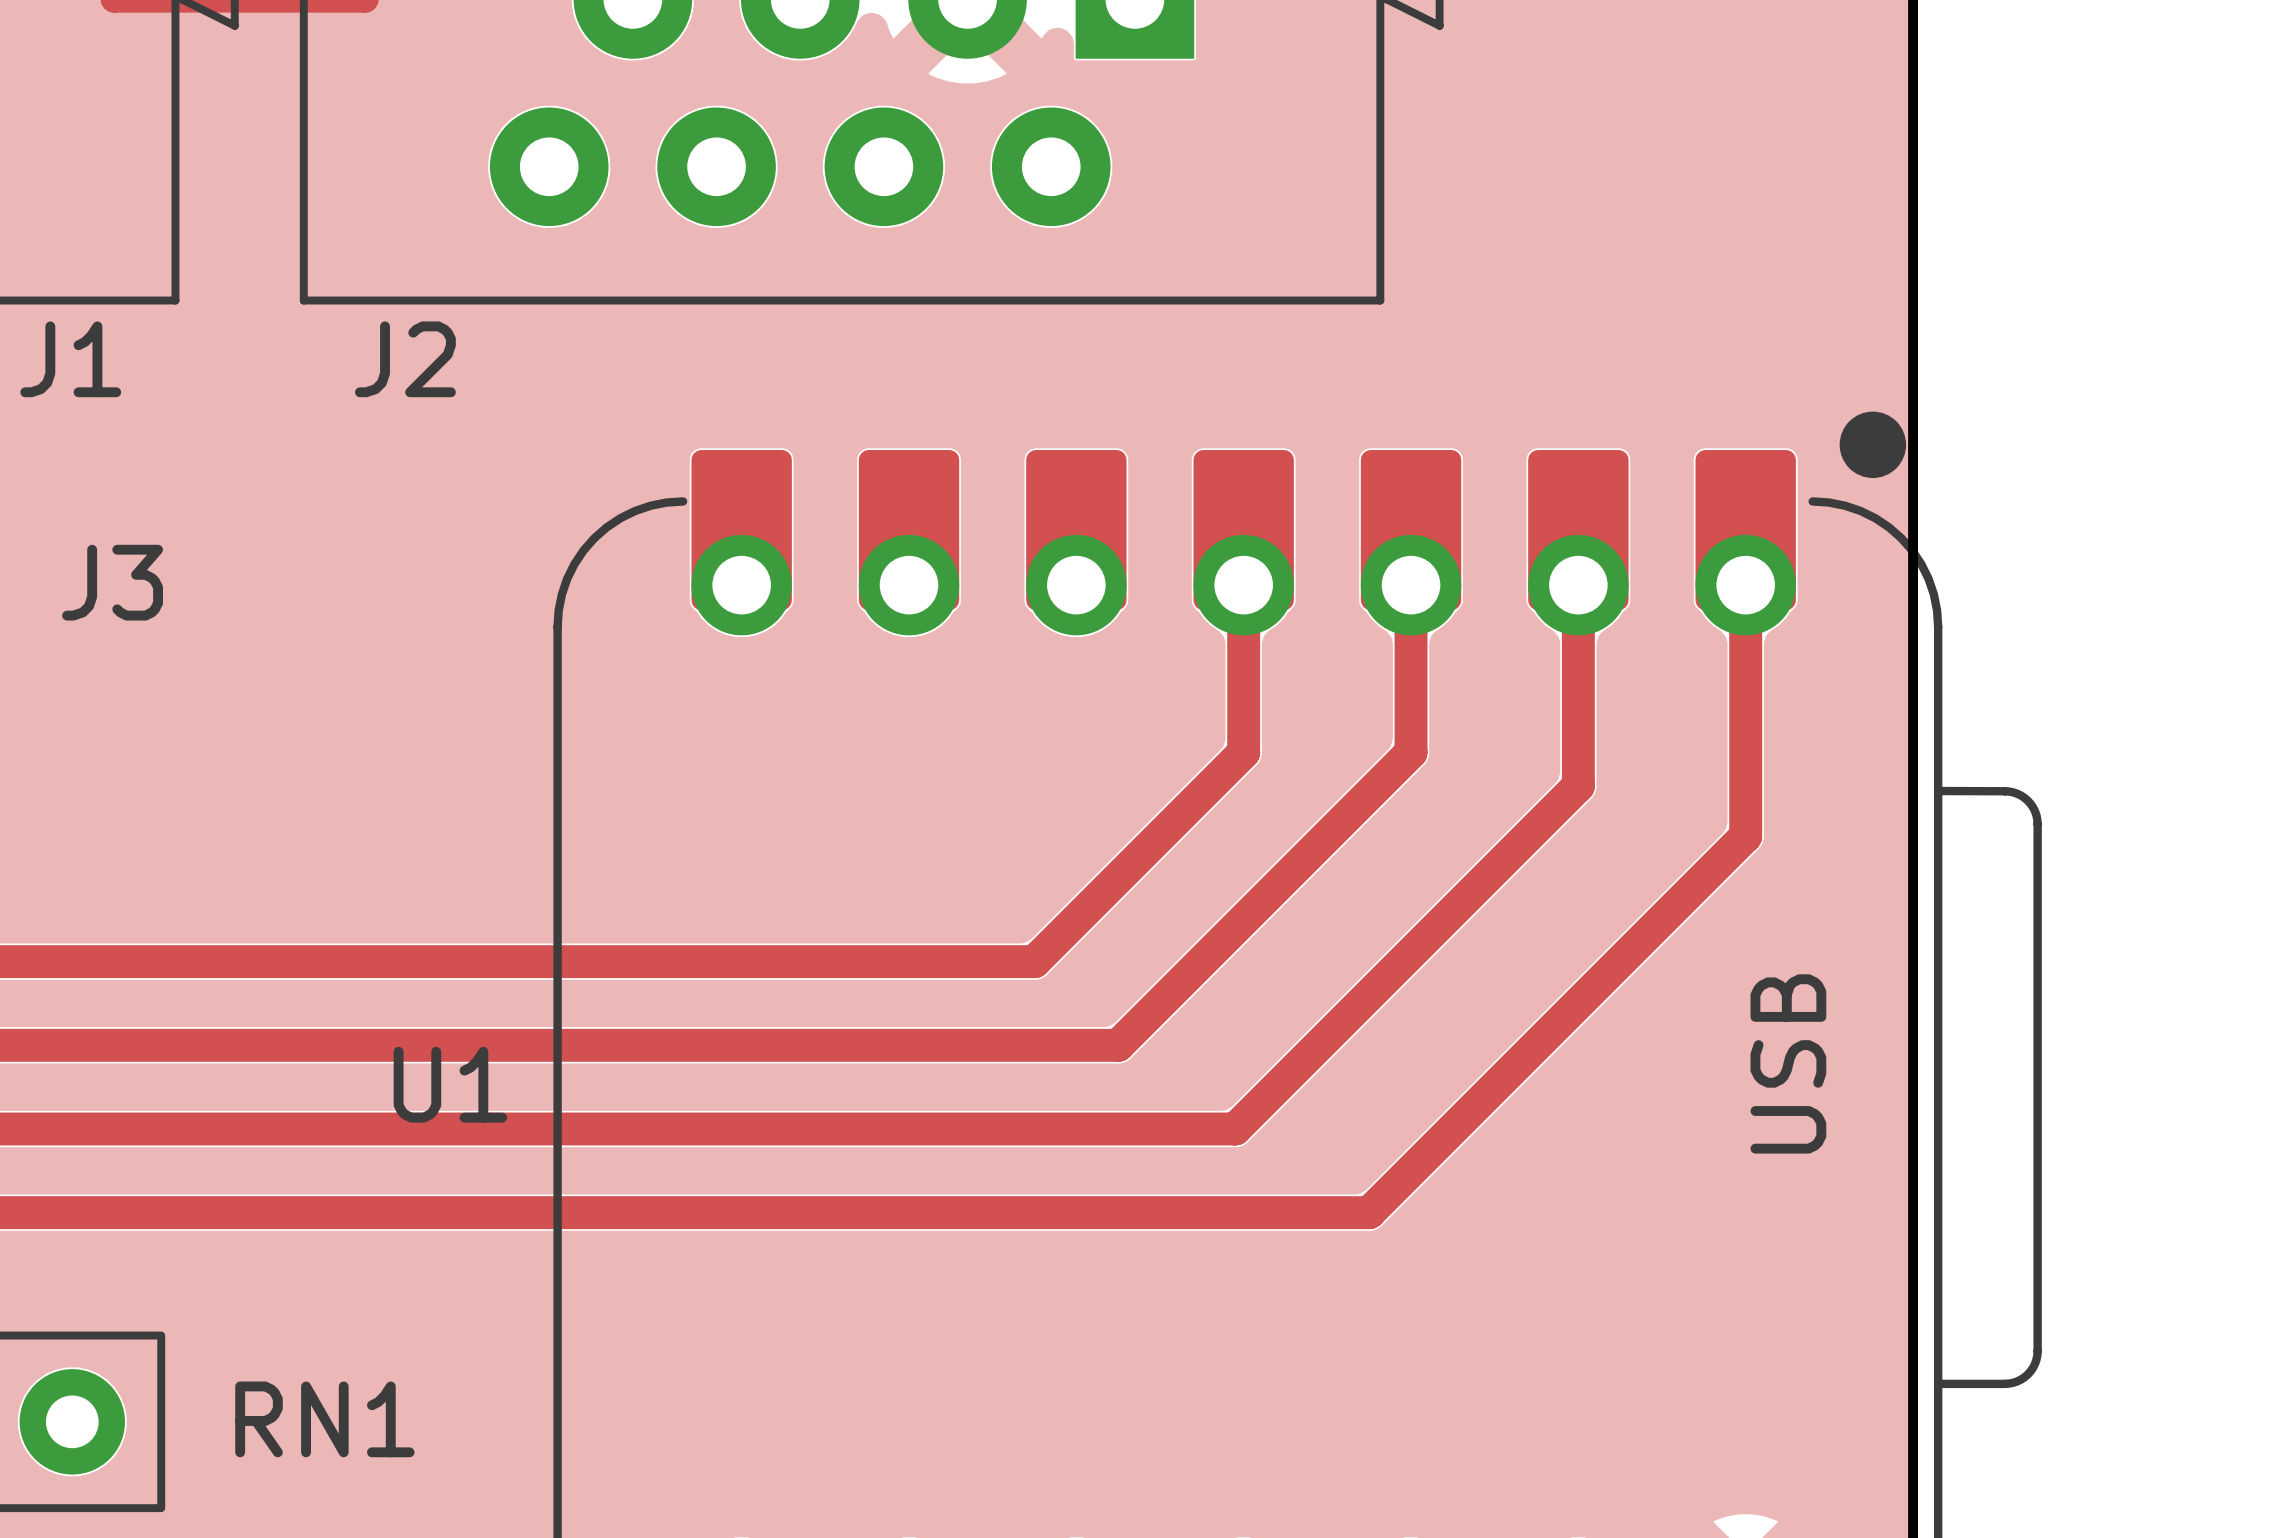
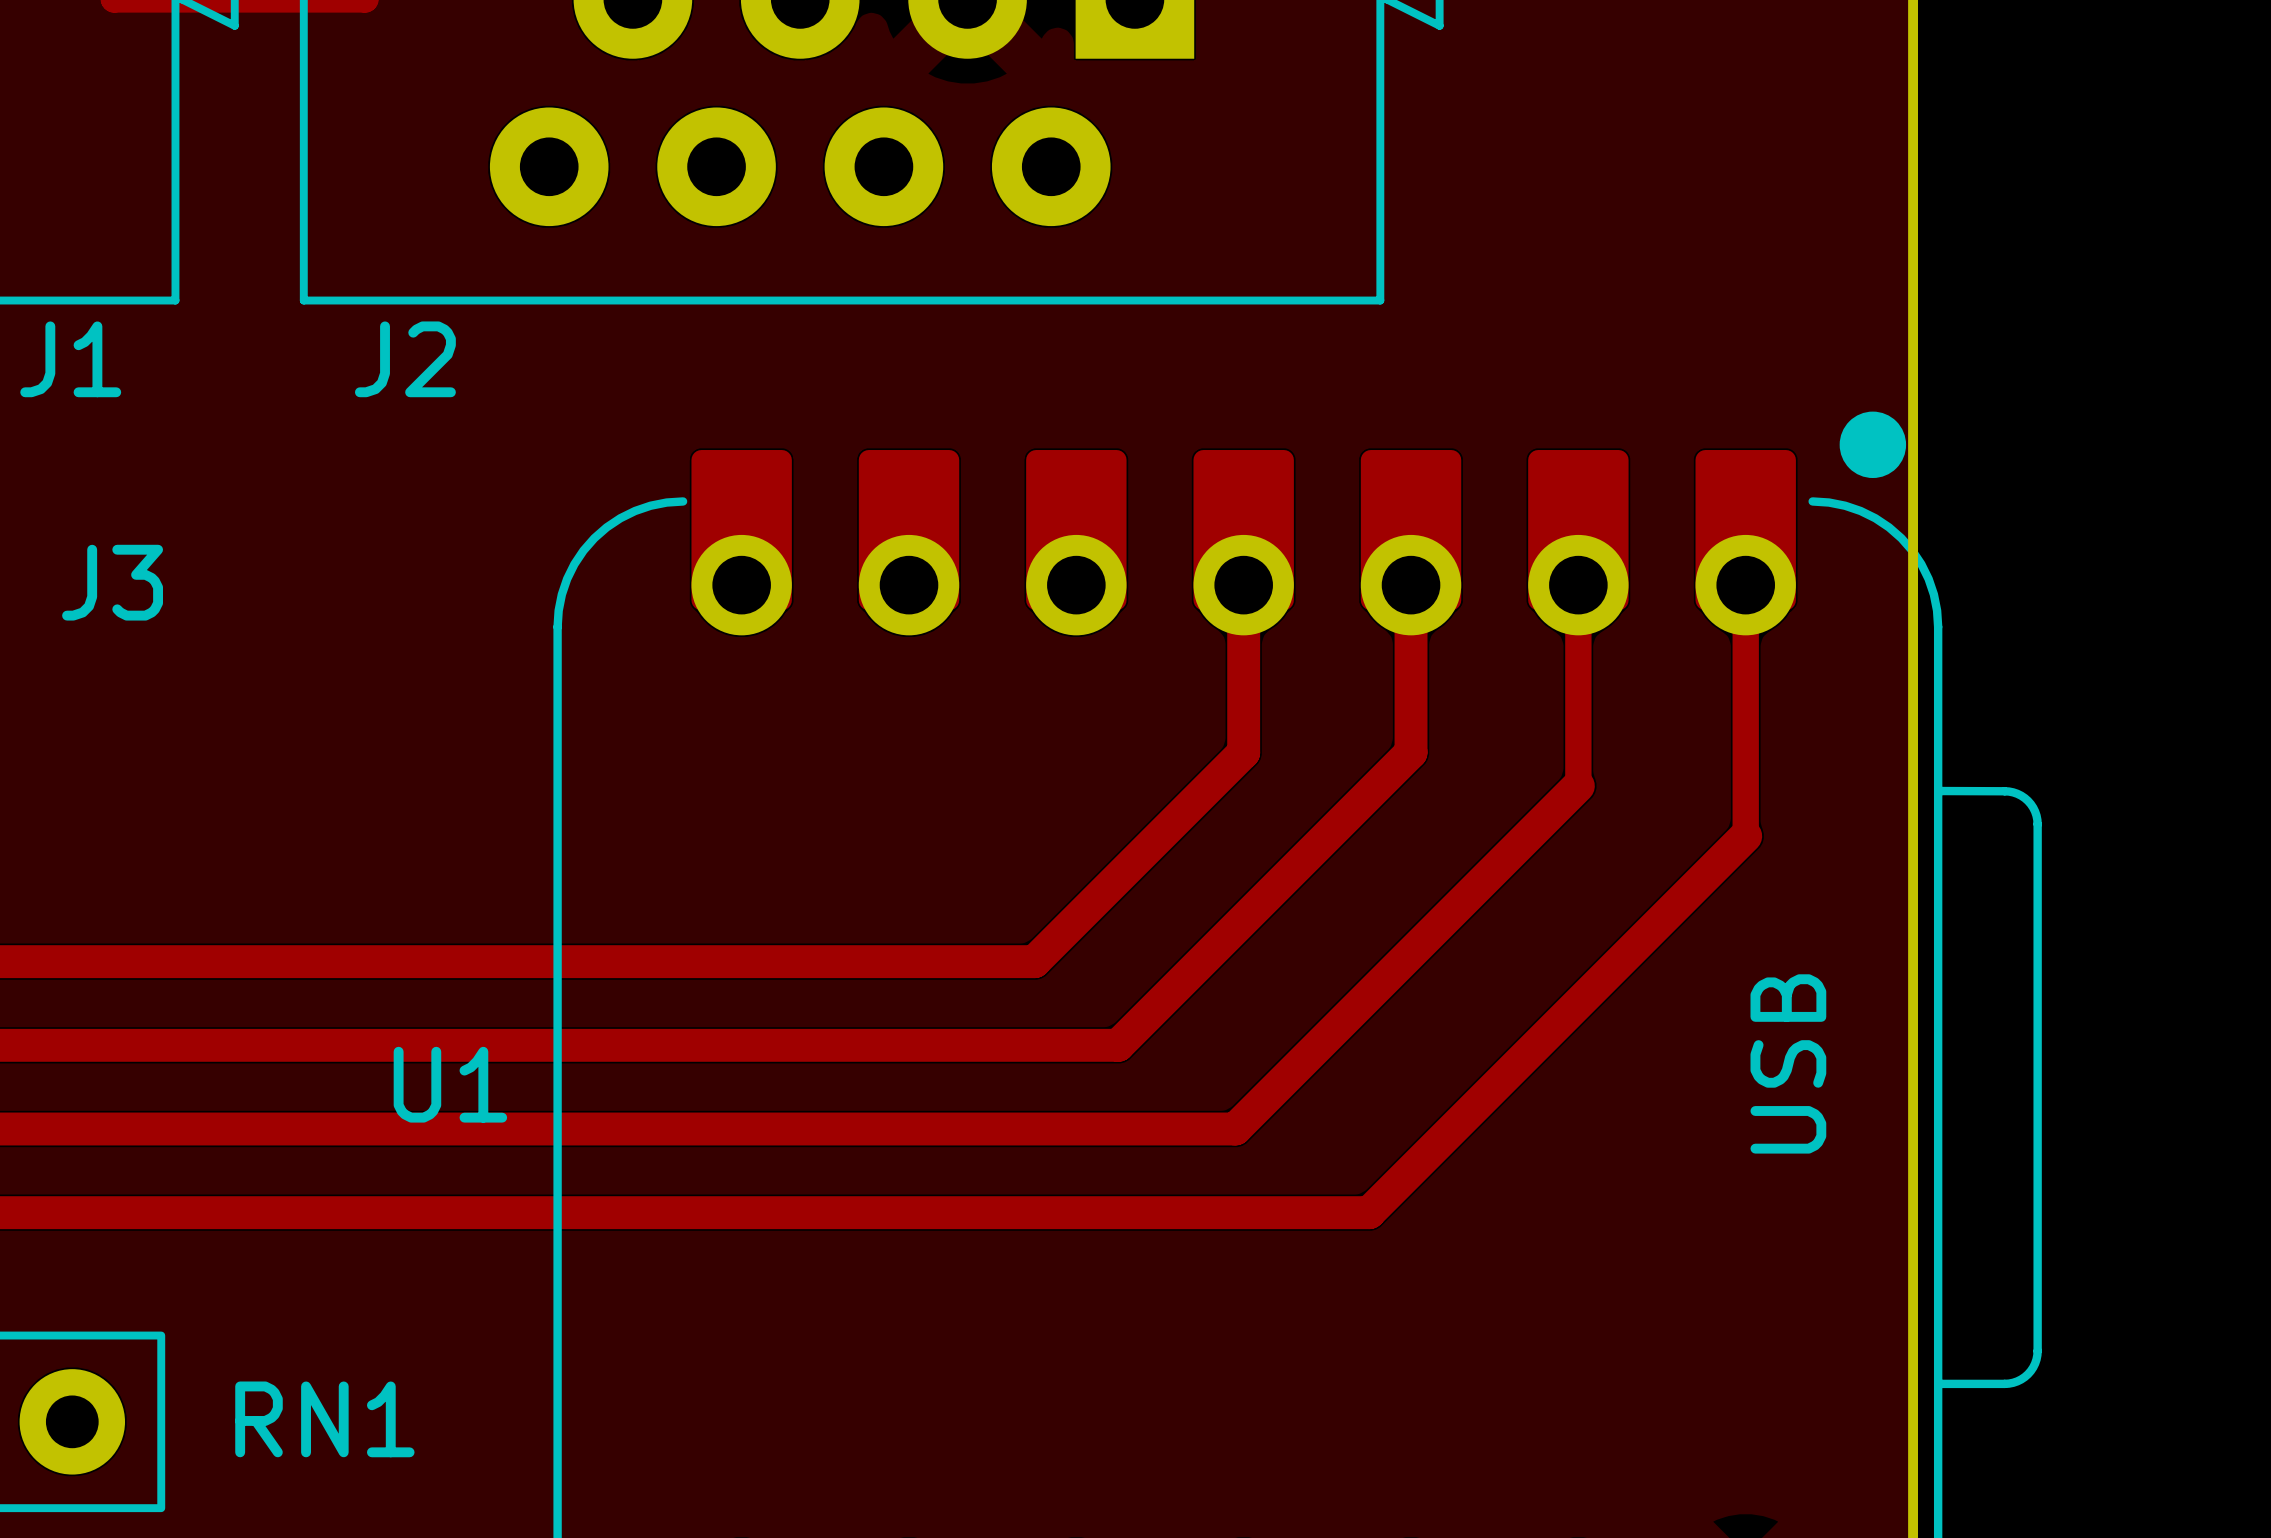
track width: thick (1578, 585) (1578, 785) -> thin (1578, 585) (1578, 785)
track width: thick (1745, 585) (1745, 836) -> thin (1745, 585) (1745, 836)

